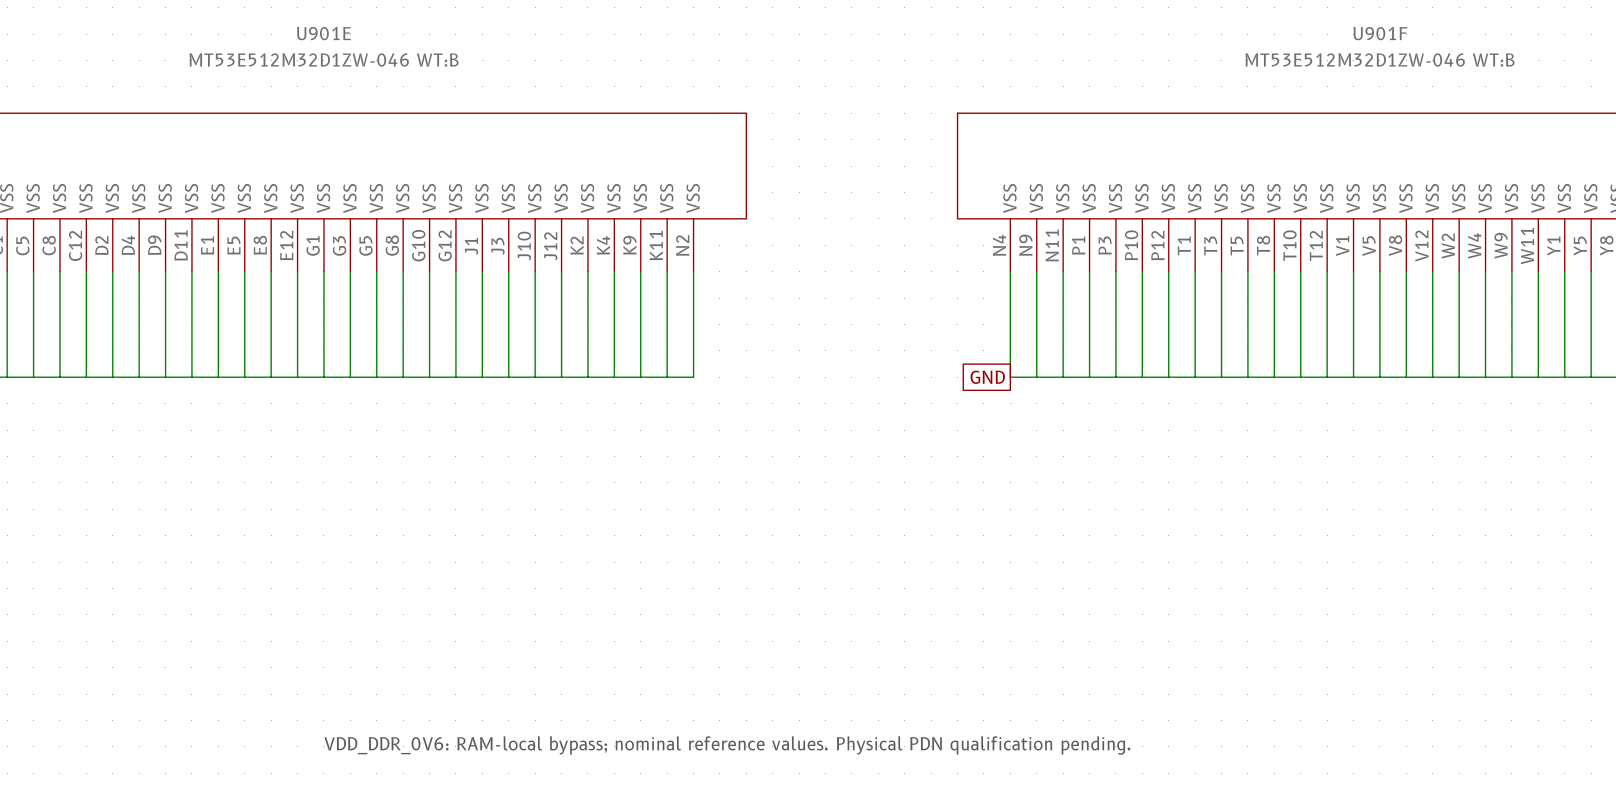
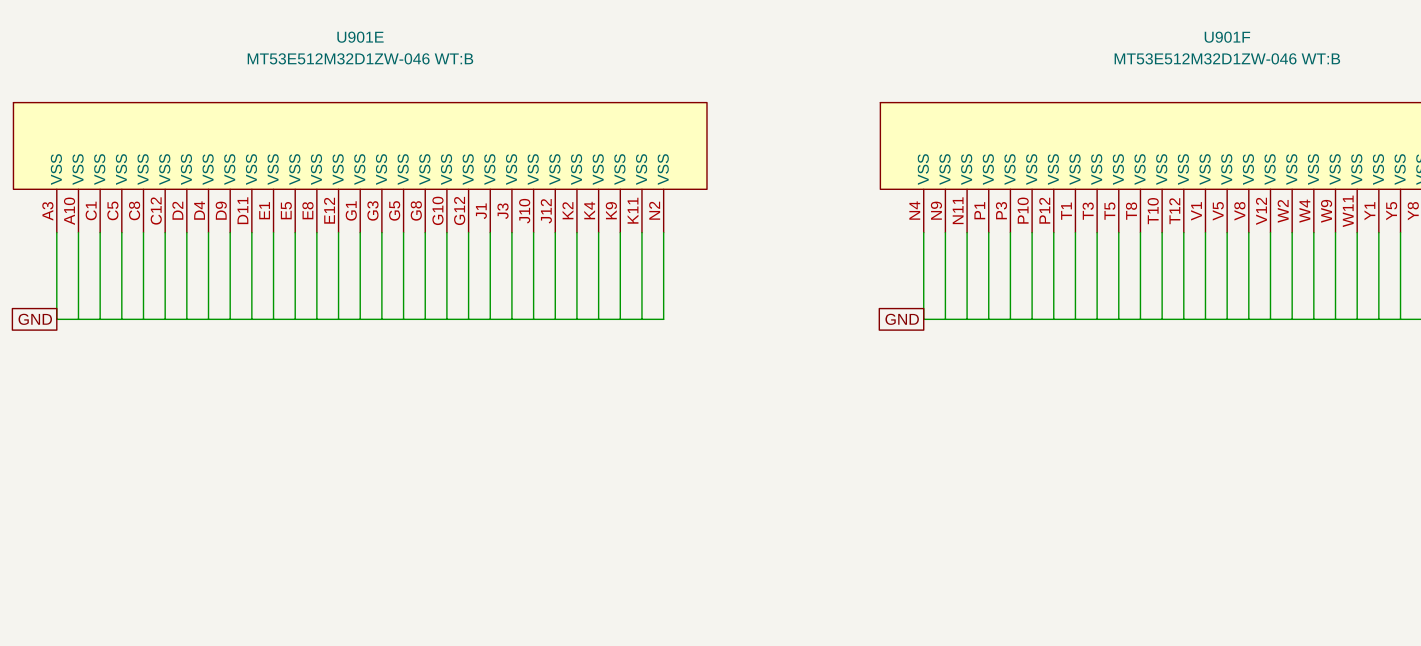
text: VDD_DDR_0V6: RAM-local bypass; nominal reference values. Physical PDN qualification pending. (727, 745) -> none

